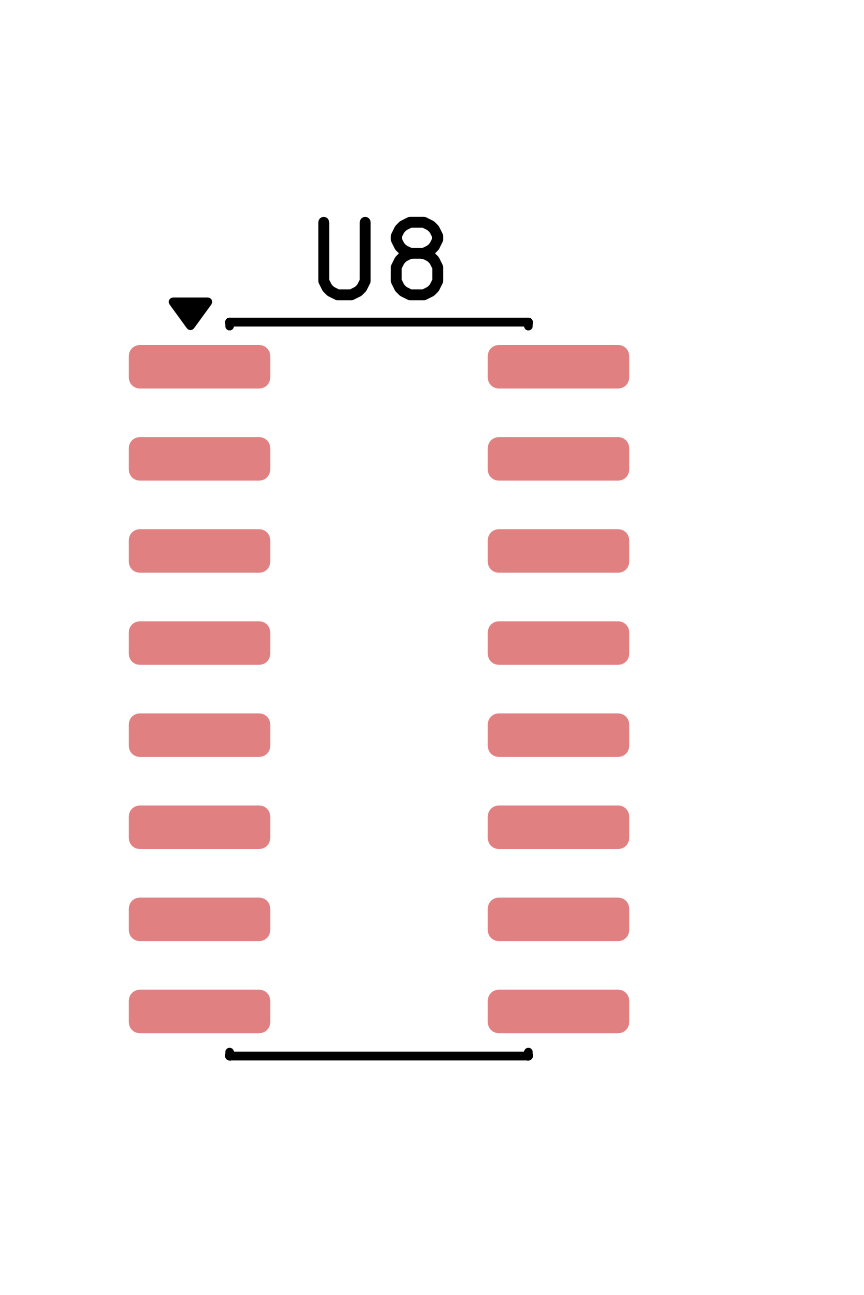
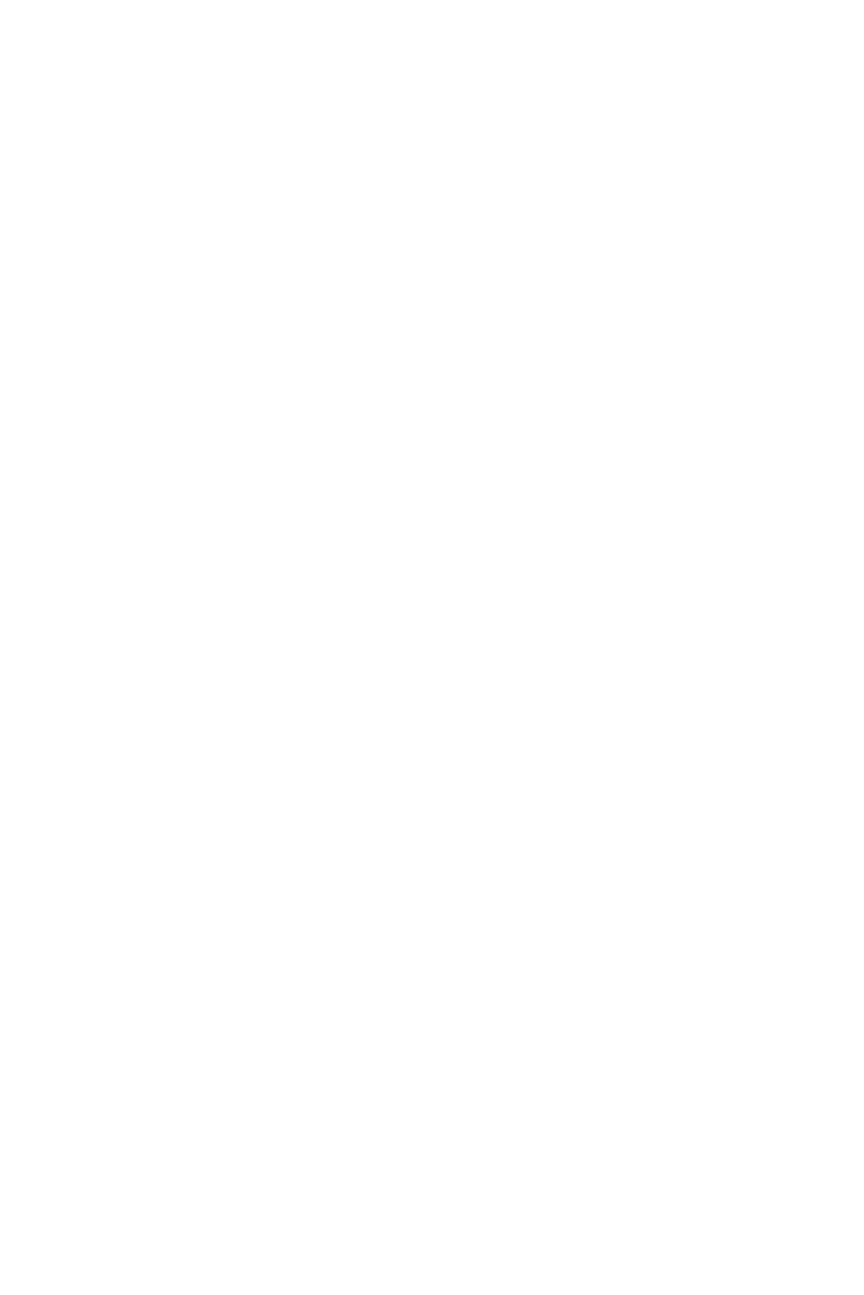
U8: (379, 678) -> none

